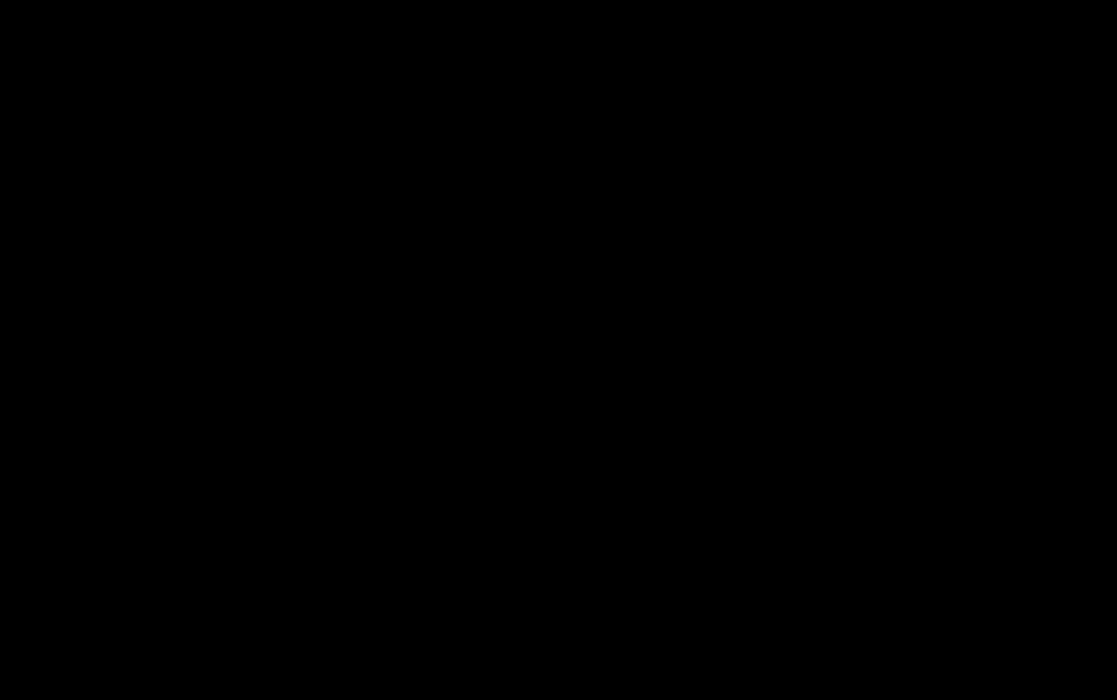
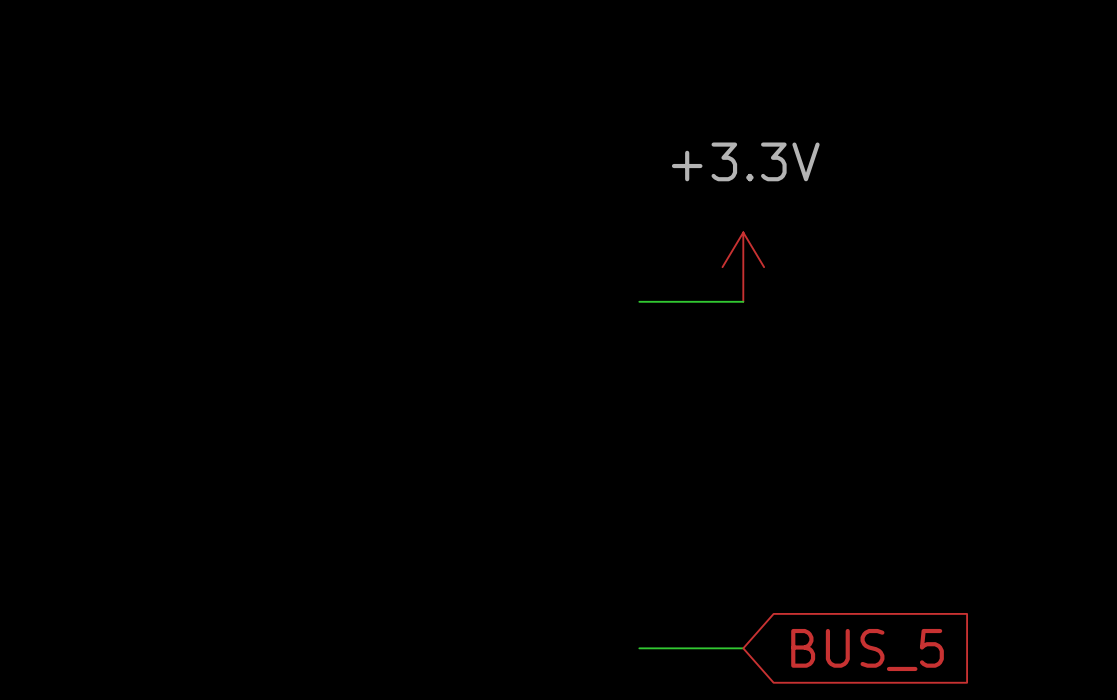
power symbol: none -> +3.3V (743, 267)
wire: none -> (639, 301) (743, 301)
wire: none -> (639, 648) (743, 648)
global label: none -> BUS_5 (867, 649)

